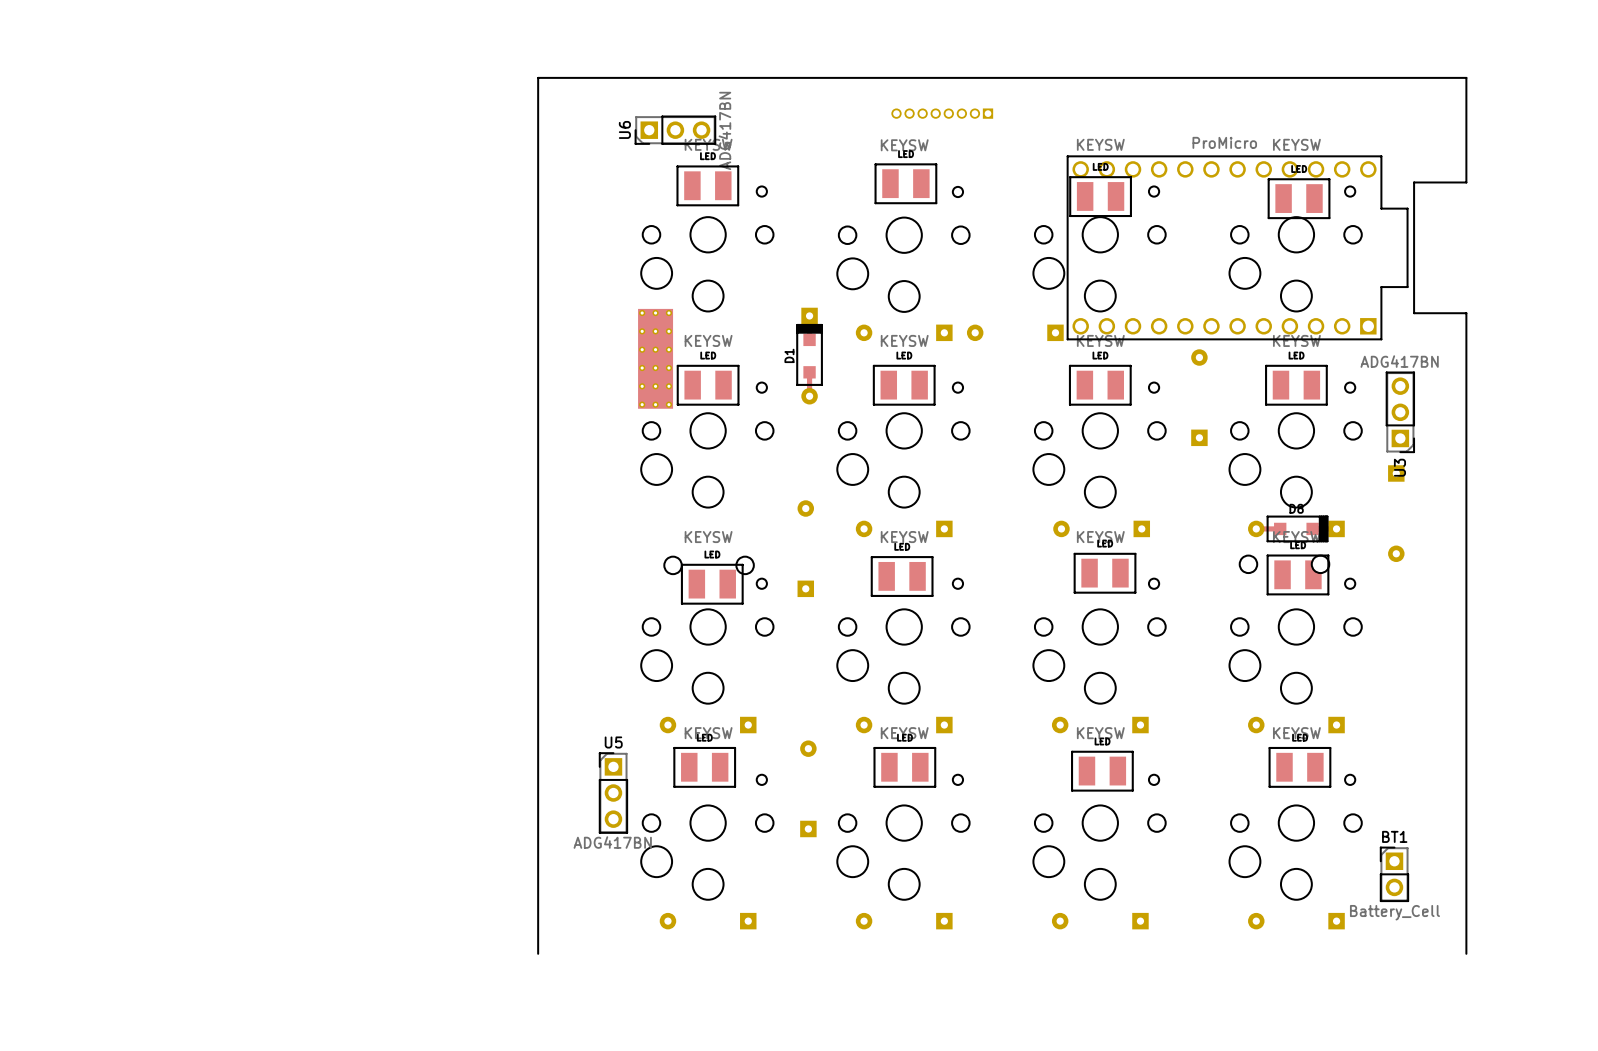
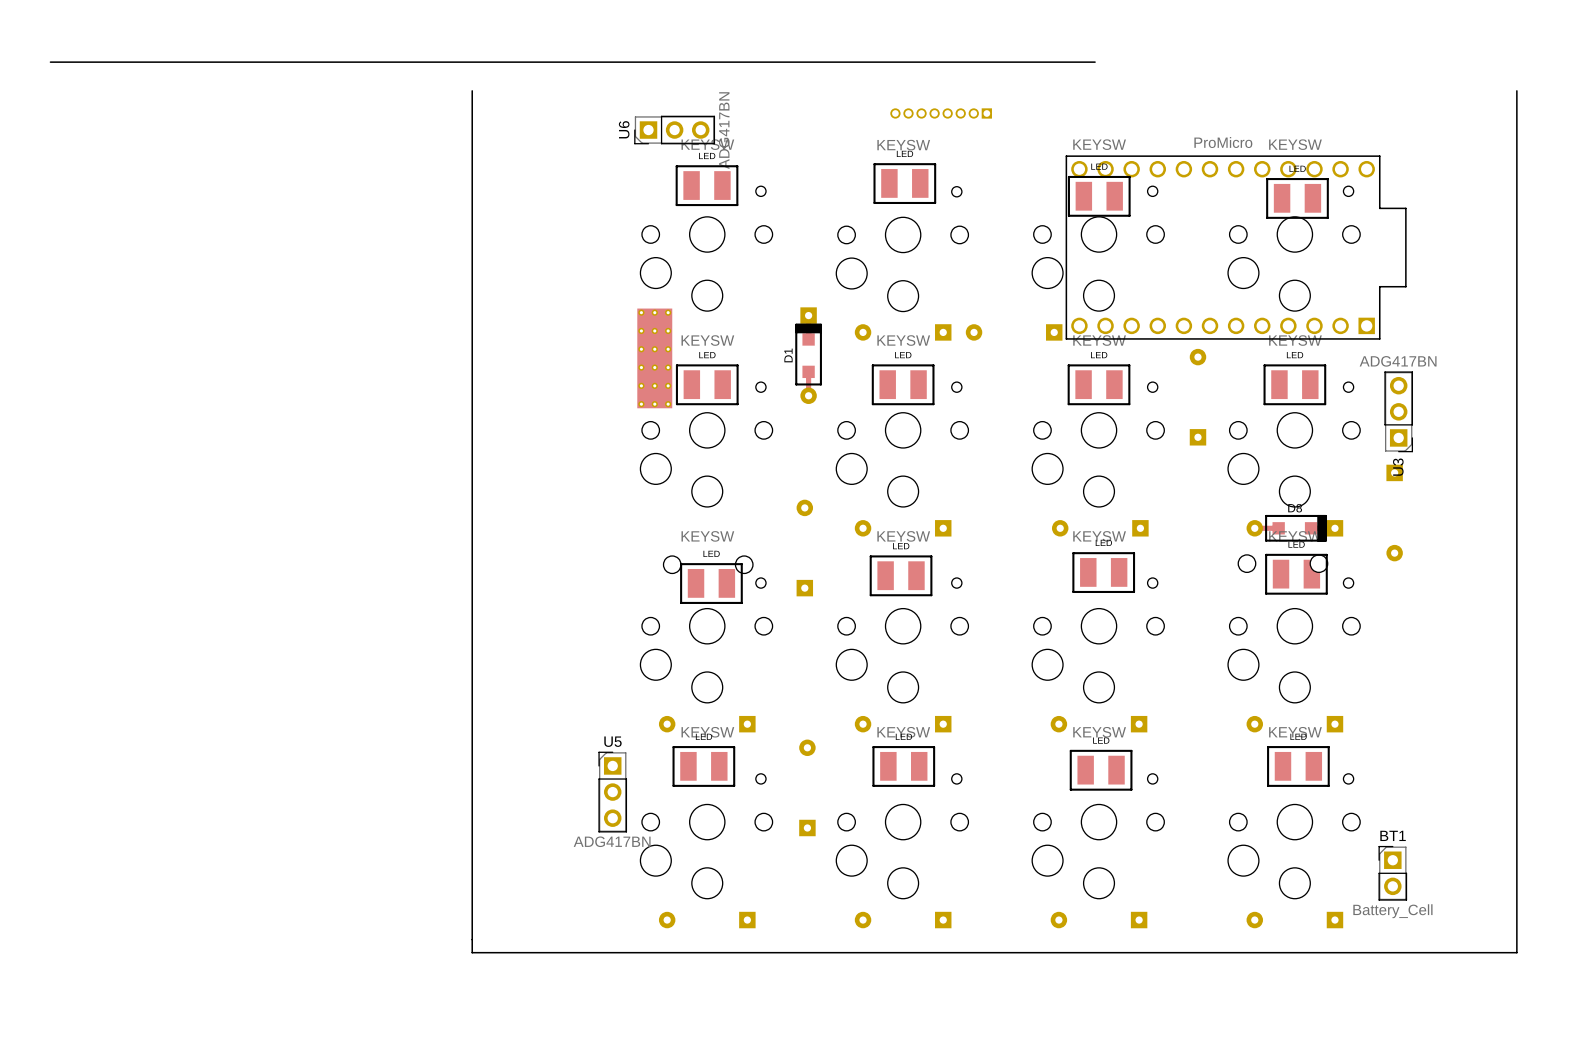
board edge: none -> (50, 62) (1095, 62)
board edge: none -> (472, 90) (472, 952) (1516, 952) (1516, 90)
board edge: (538, 953) (538, 77) (1466, 77) (1466, 182) (1414, 182) (1414, 313) (1466, 313) (1466, 953) -> none

